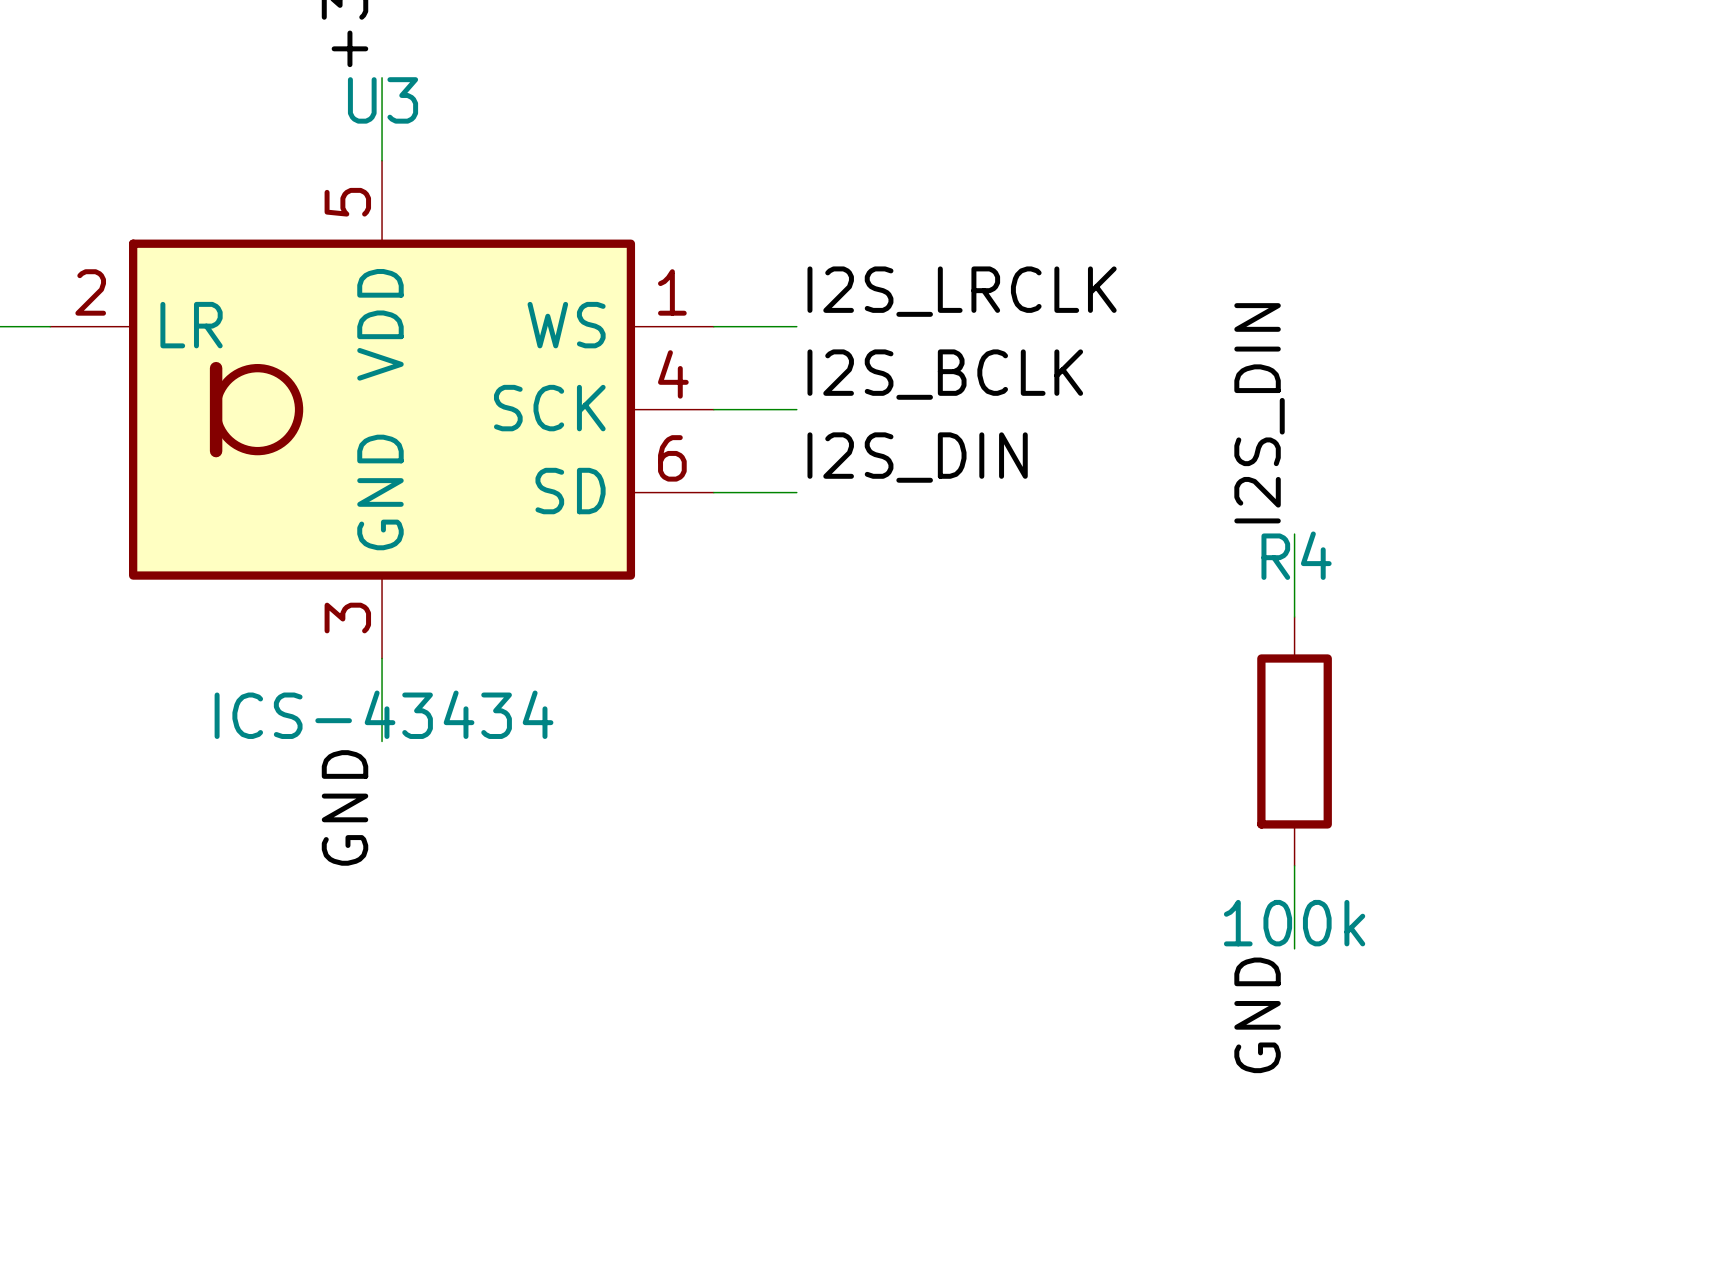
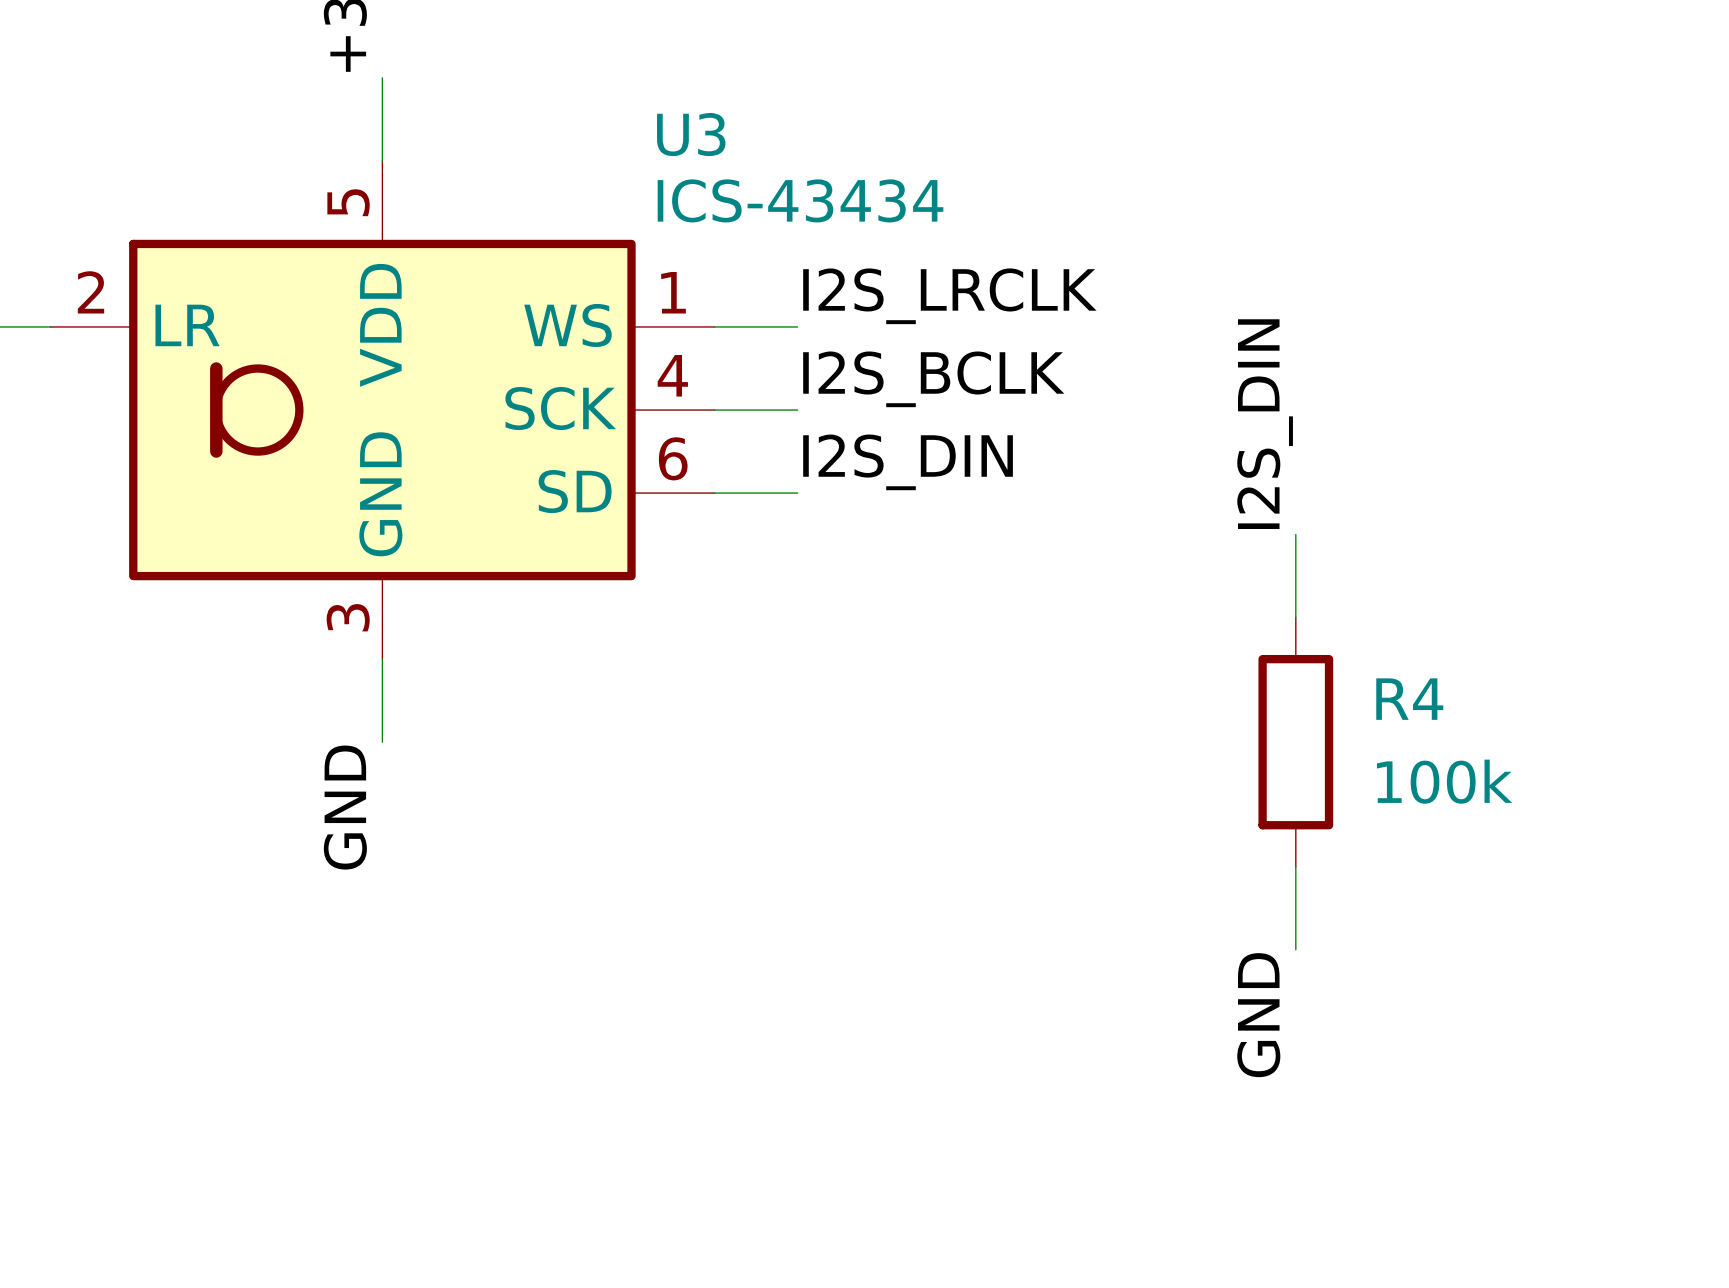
U3 name position: U3 (383, 100) -> U3 (691, 134)
R4 name position: R4 (1296, 555) -> R4 (1409, 699)
U3 value position: ICS-43434 (384, 714) -> ICS-43434 (800, 200)
R4 value position: 100k (1294, 923) -> 100k (1444, 781)

